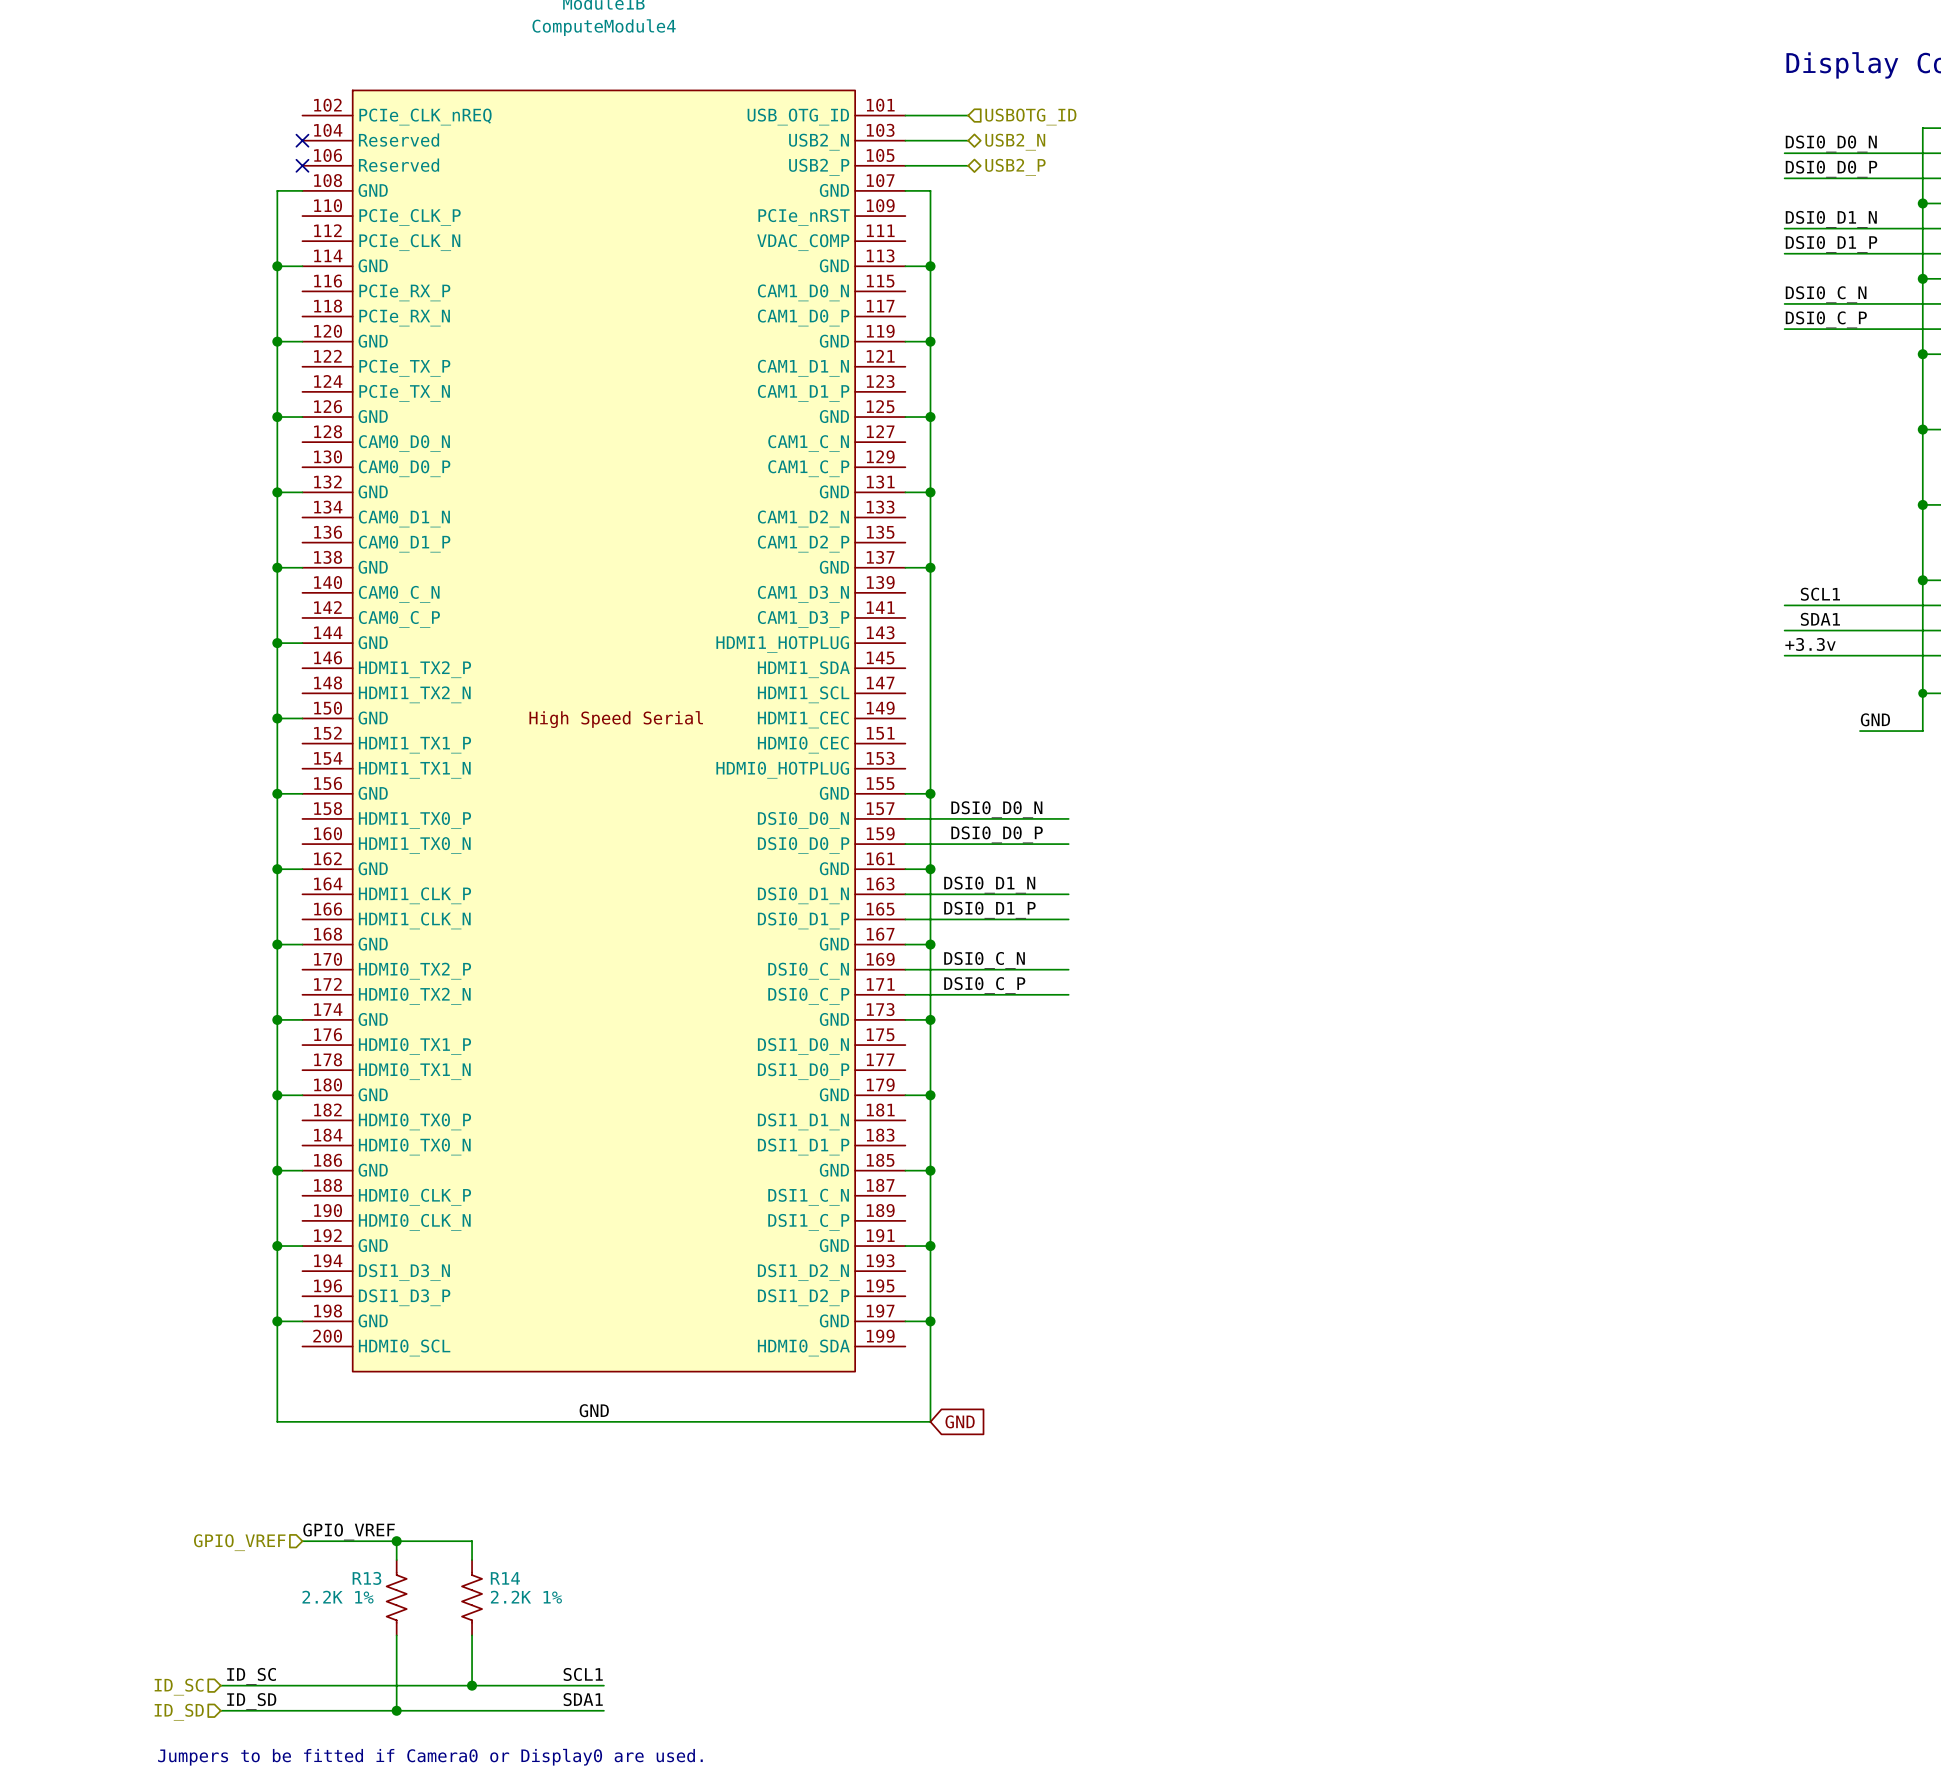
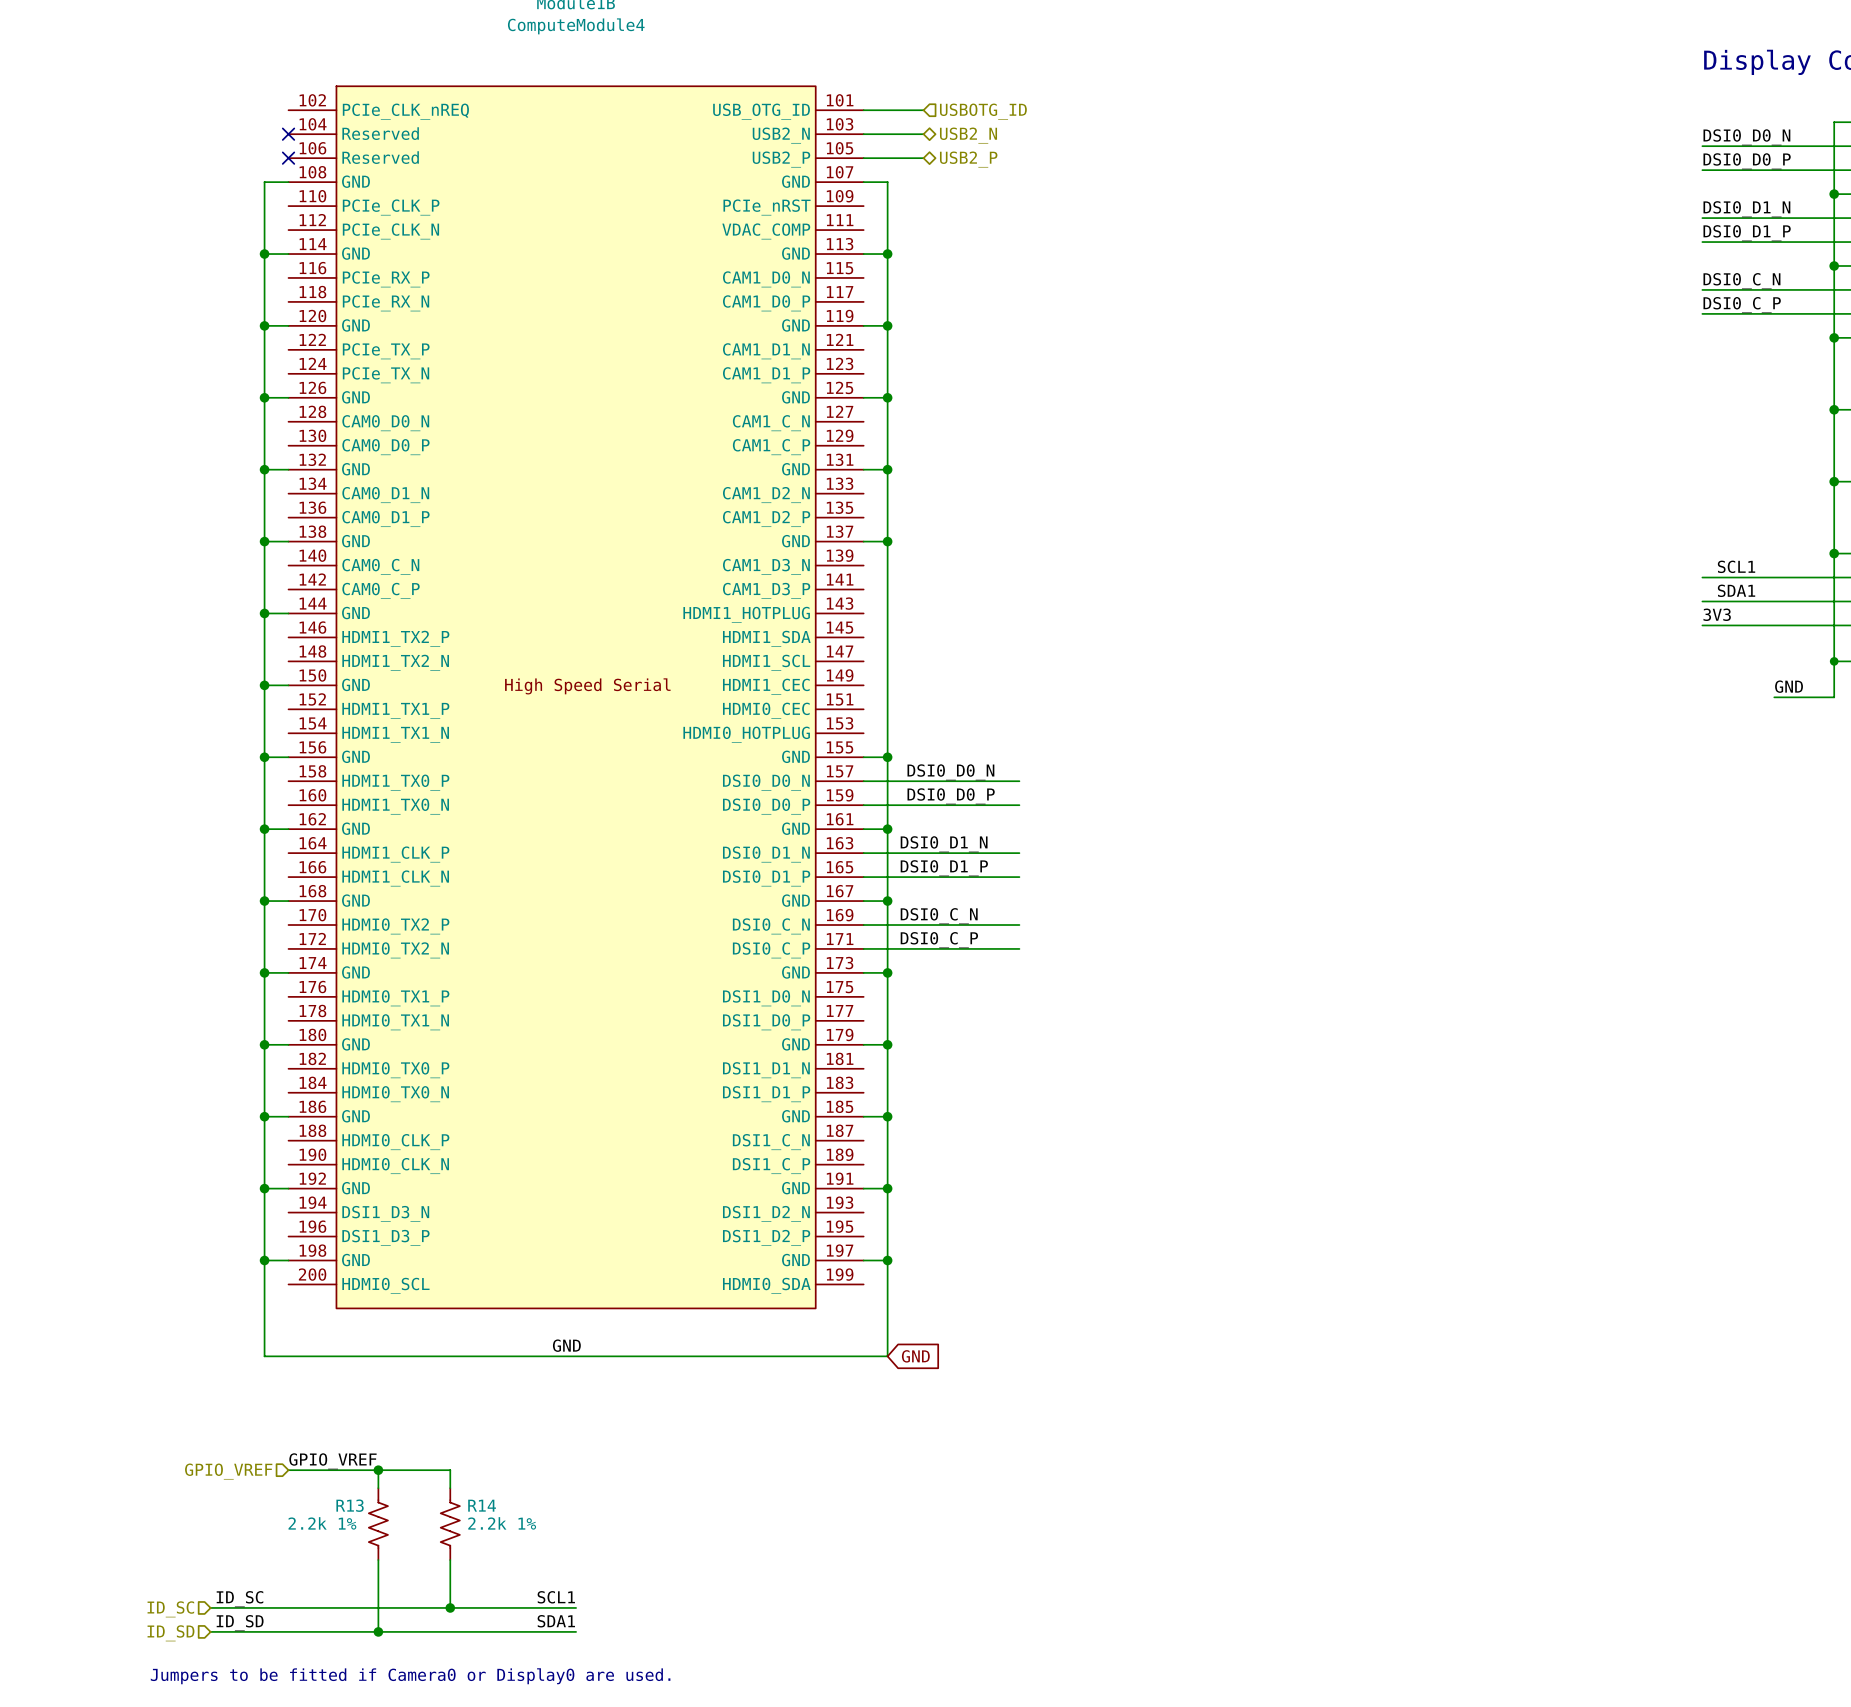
label: +3.3v (1810, 644) -> 3V3 (1717, 614)
R13 value: 2.2K 1% (338, 1597) -> 2.2k 1% (322, 1523)
R14 value: 2.2K 1% (526, 1597) -> 2.2k 1% (502, 1523)

